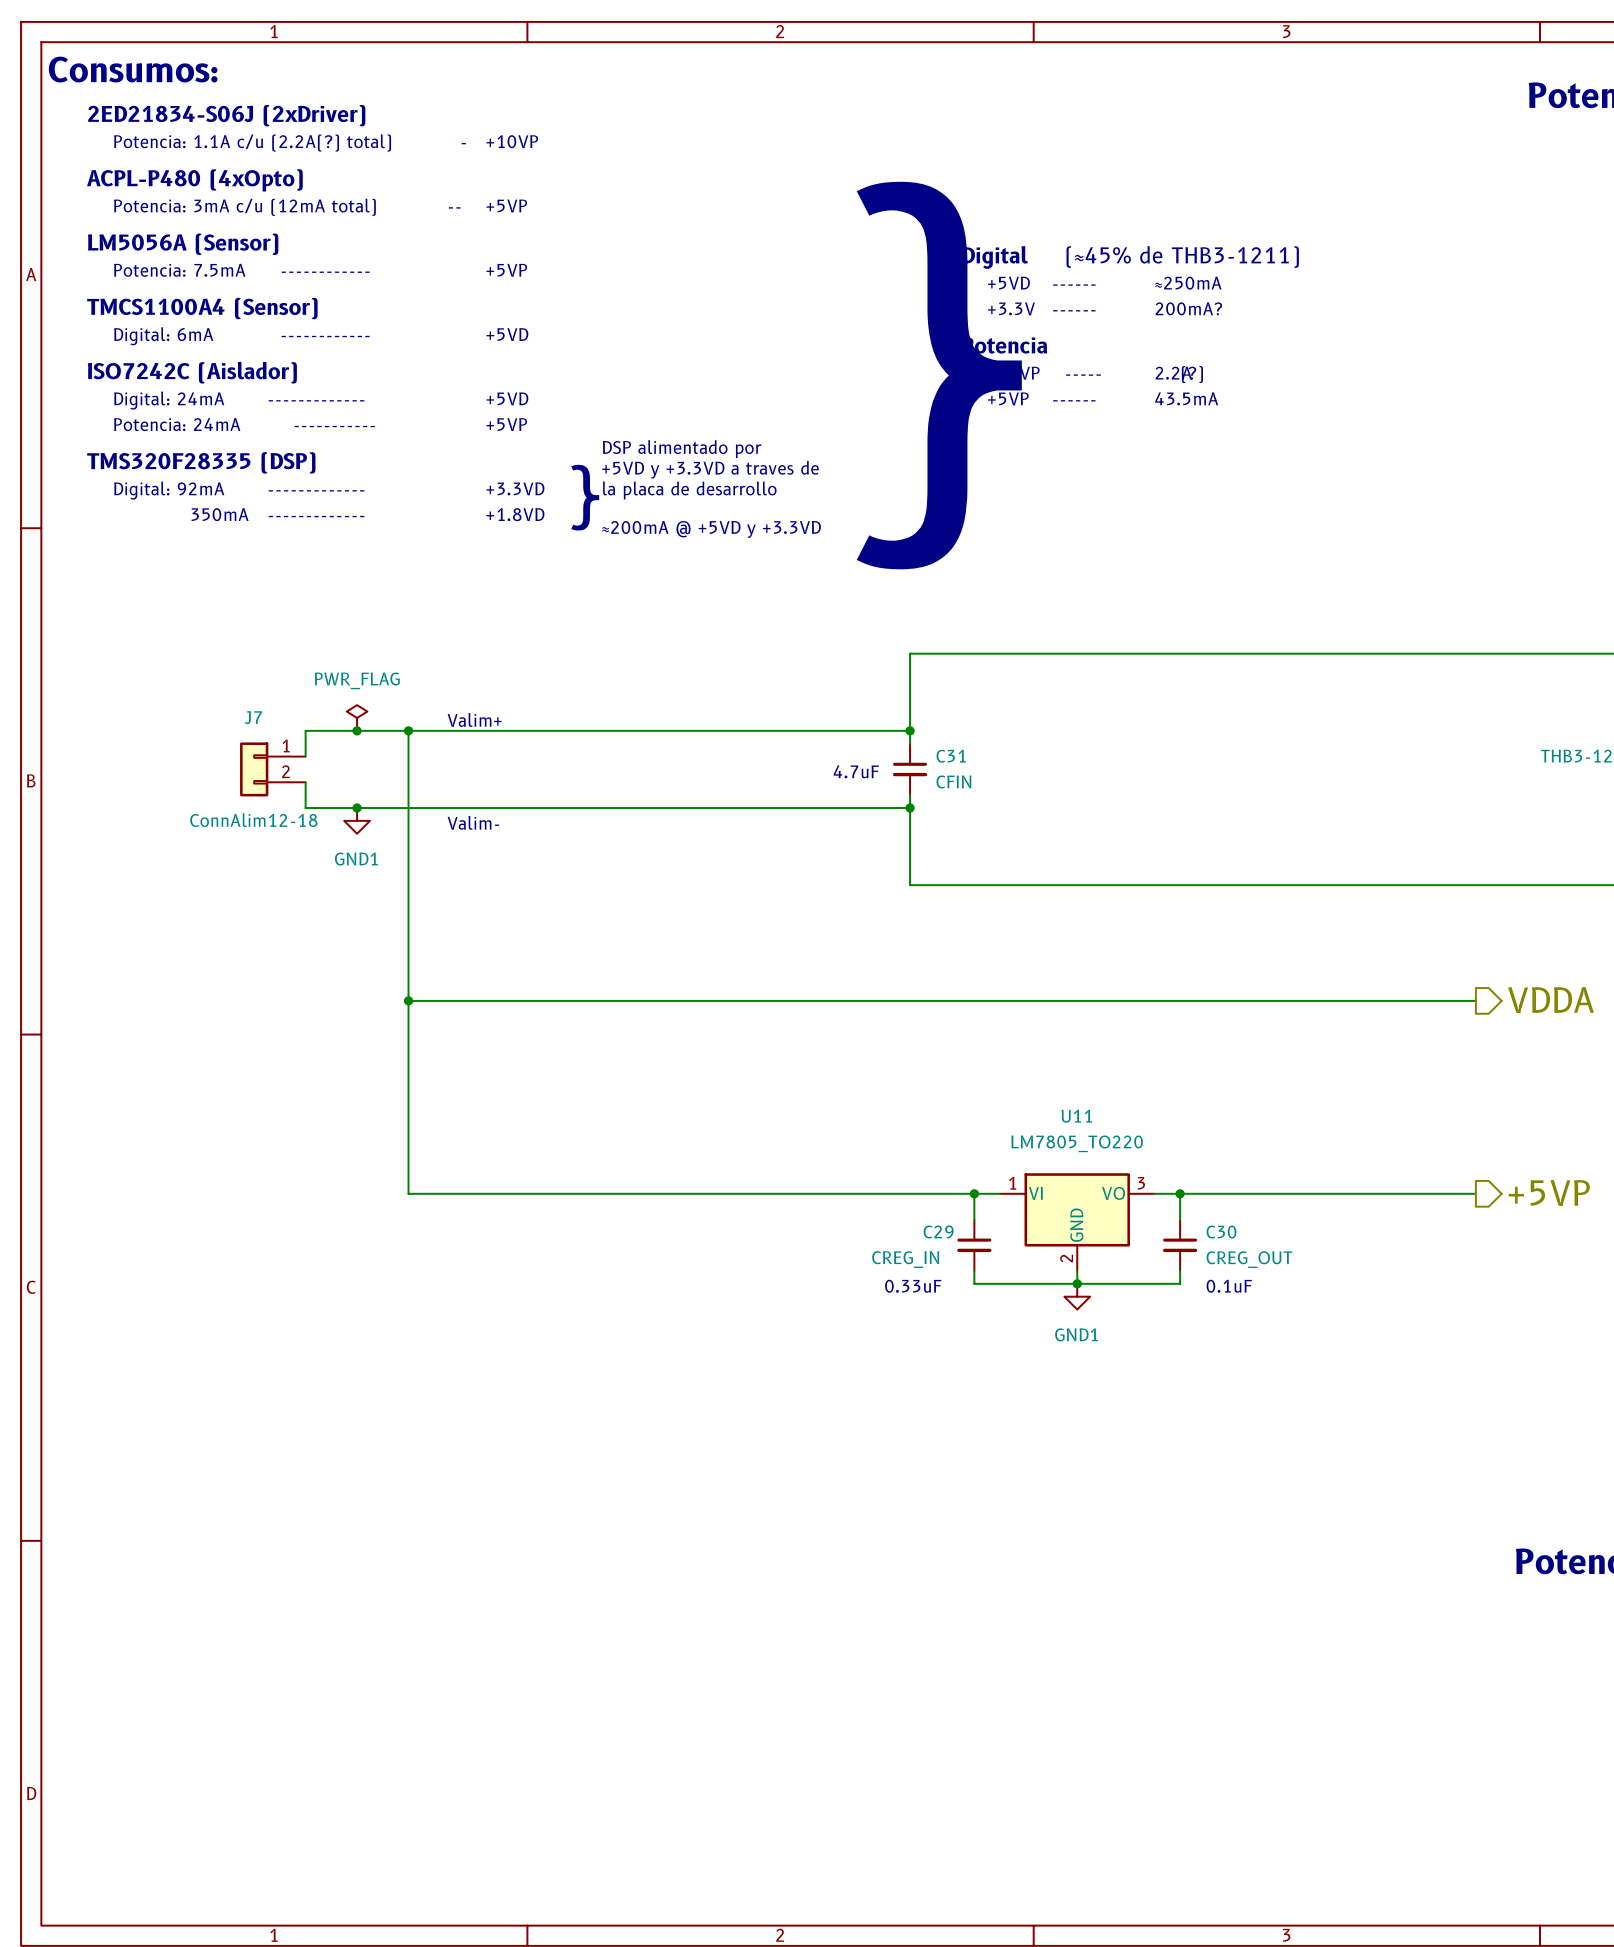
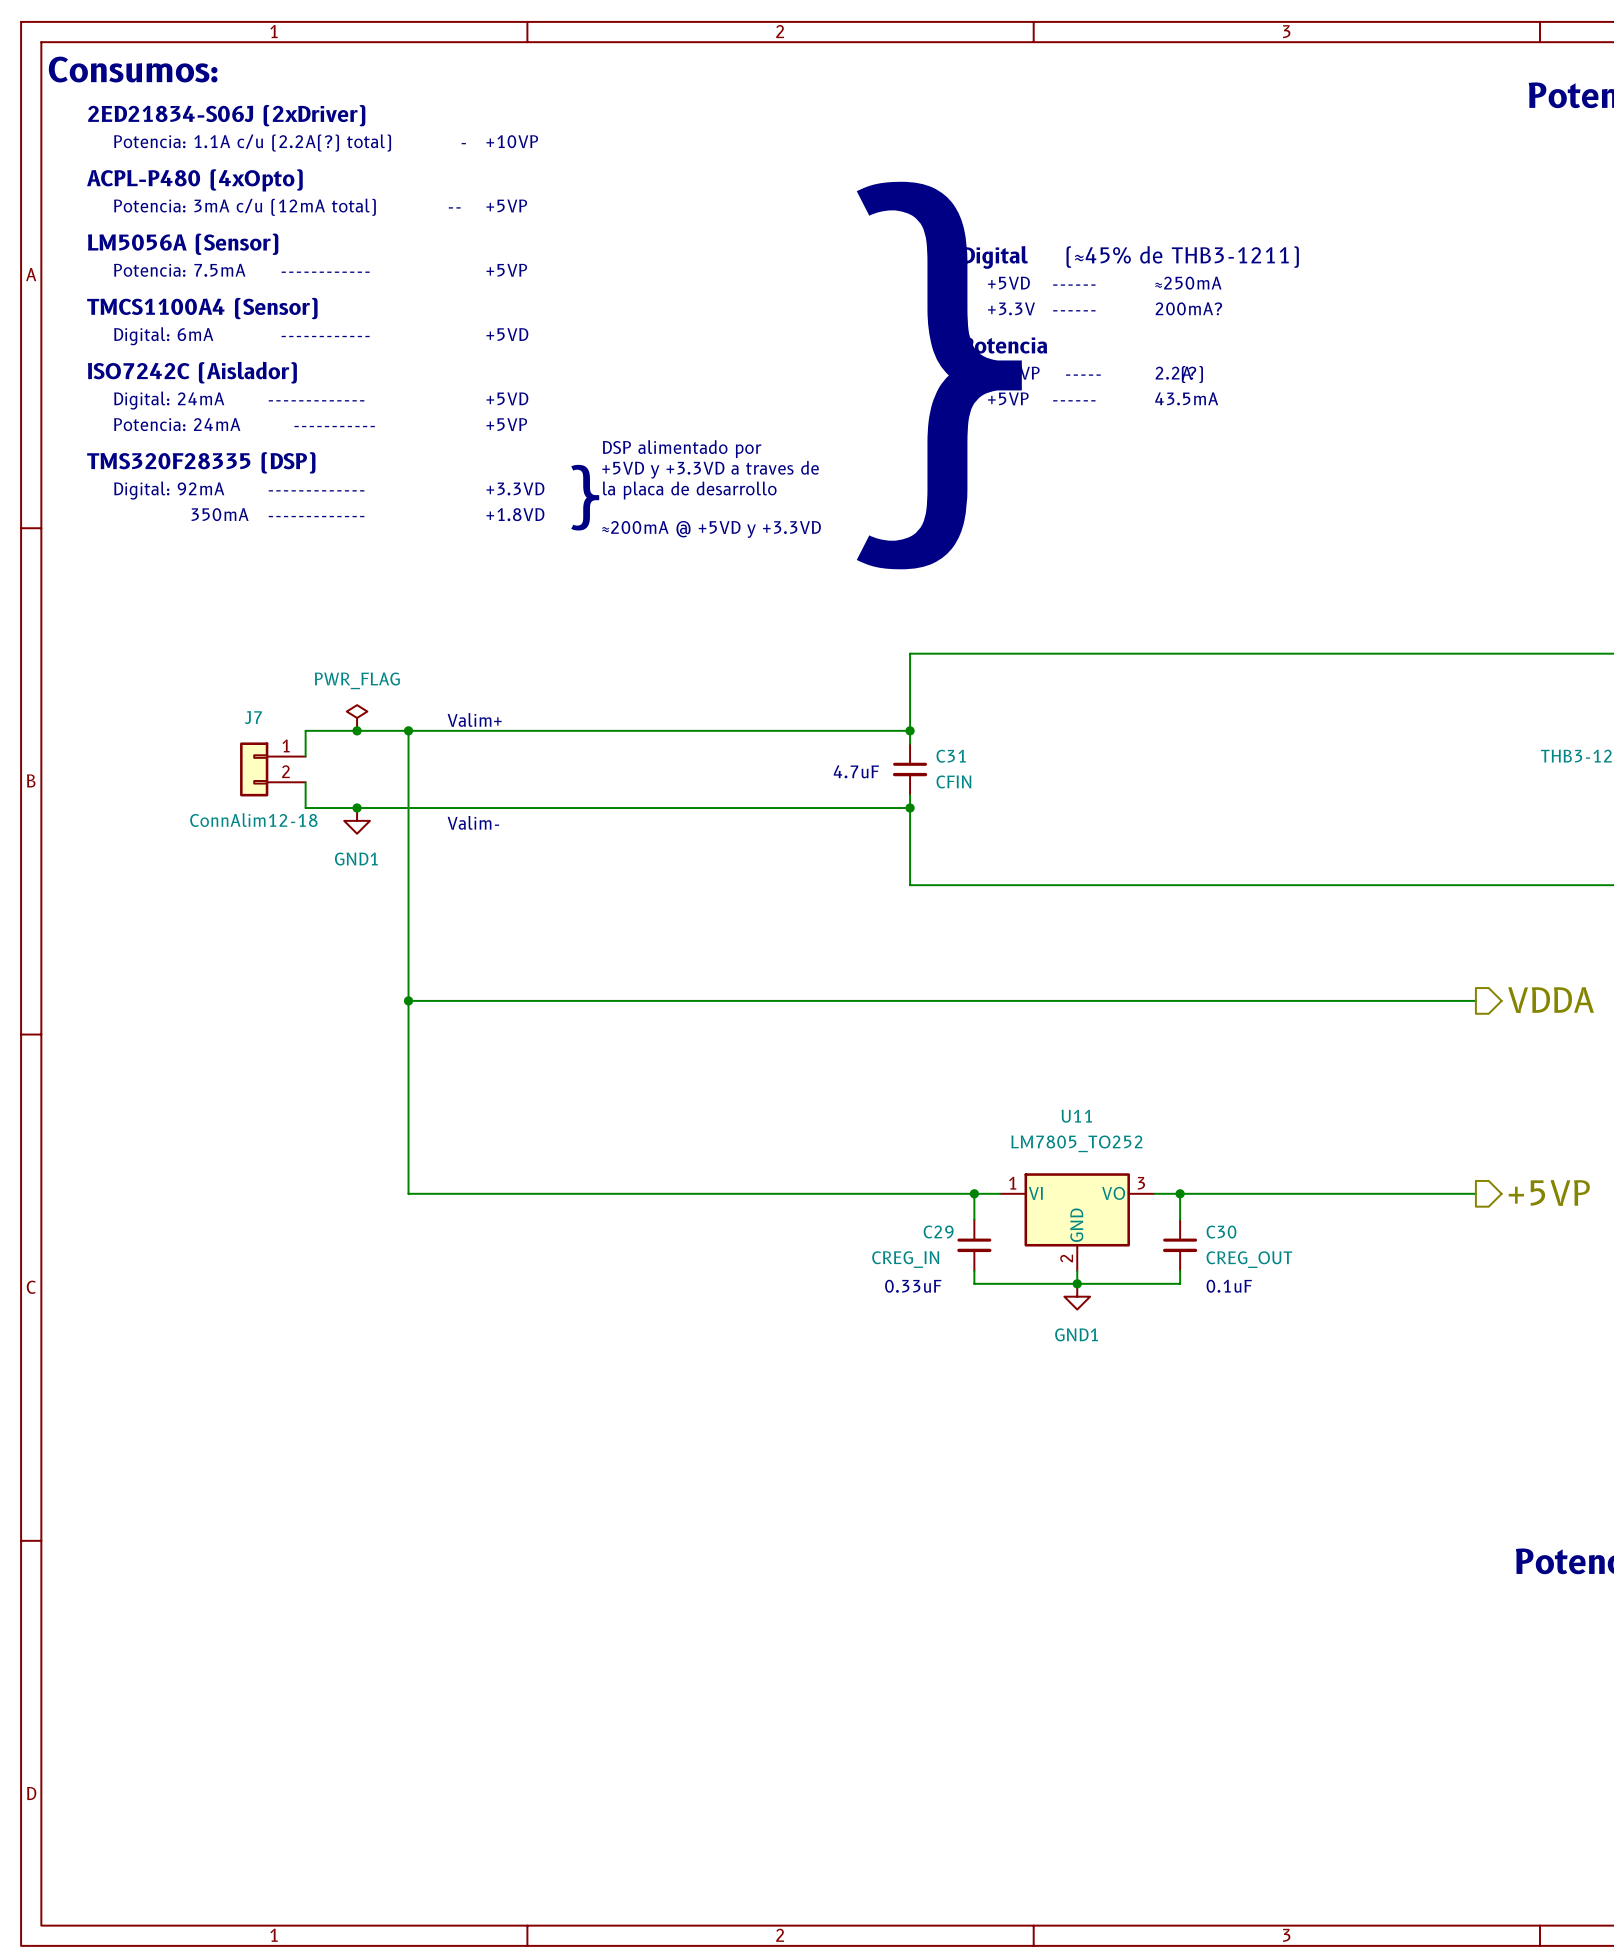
U11 value: LM7805_TO220 (1077, 1143) -> LM7805_TO252 (1076, 1143)

